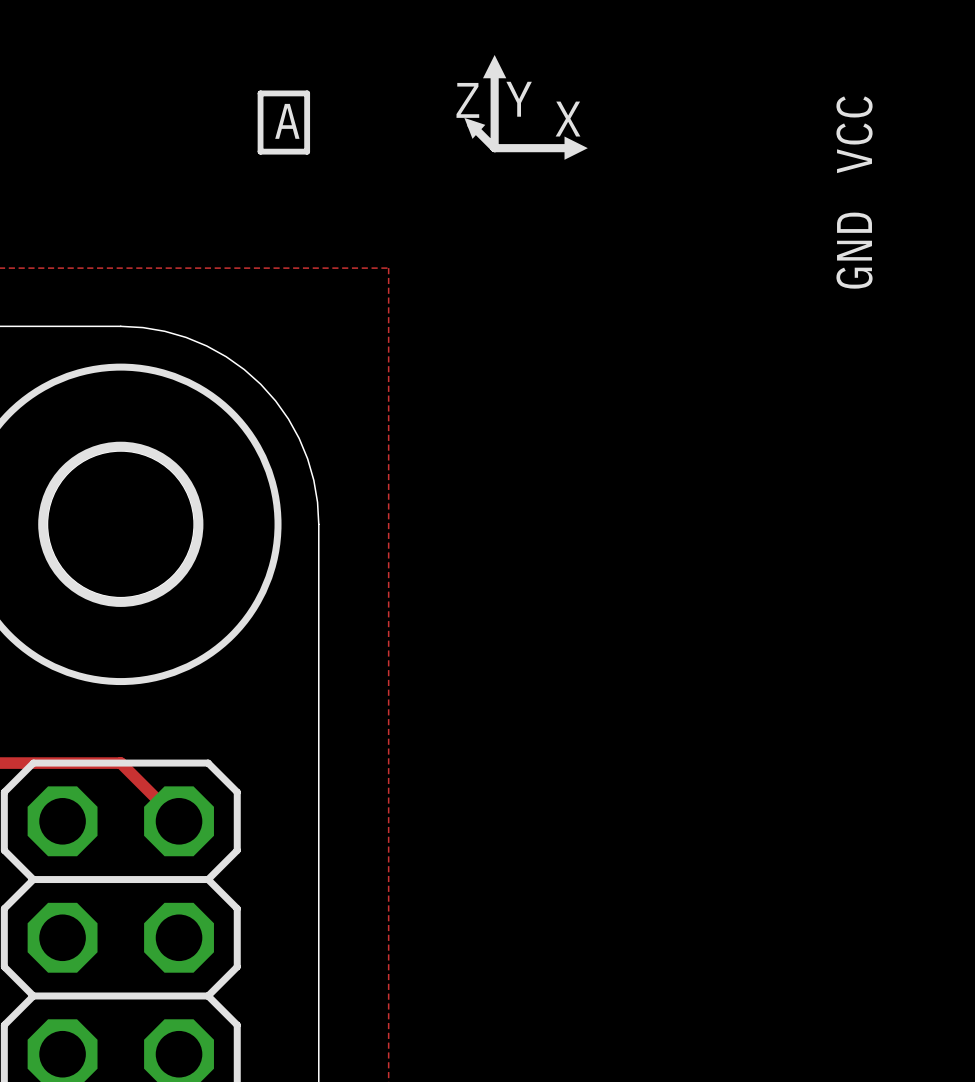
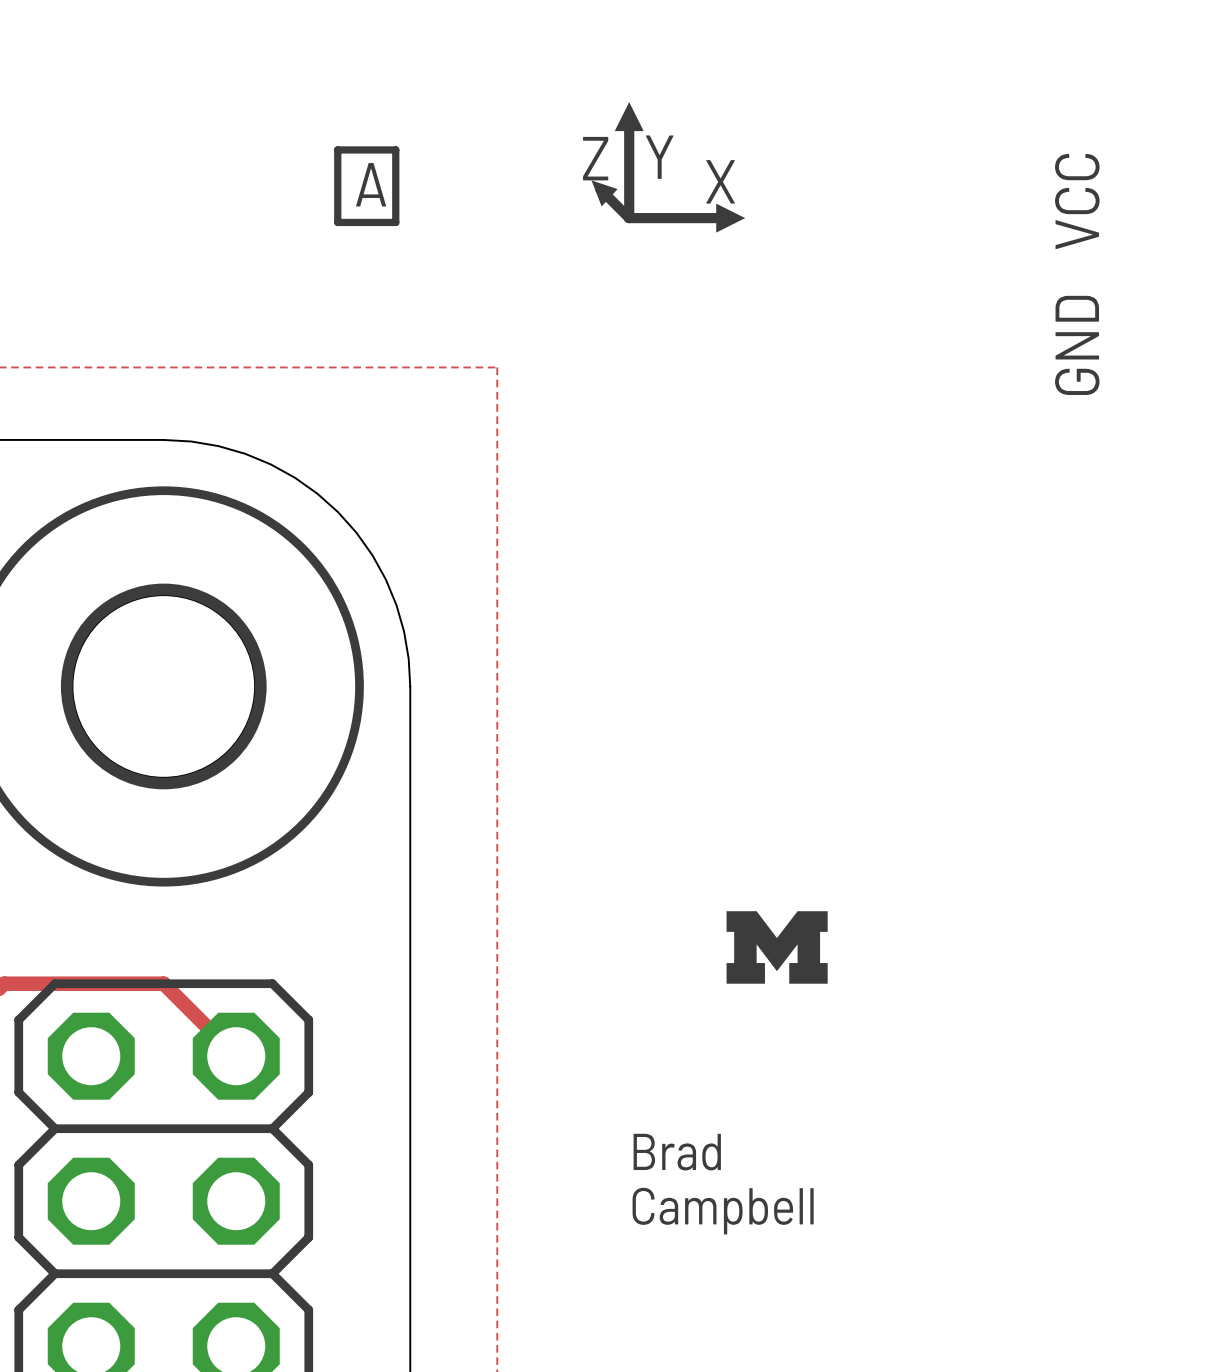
drawing: none -> [726, 911, 828, 984]
text: none -> Brad (677, 1152)
text: none -> Campbell (723, 1211)

